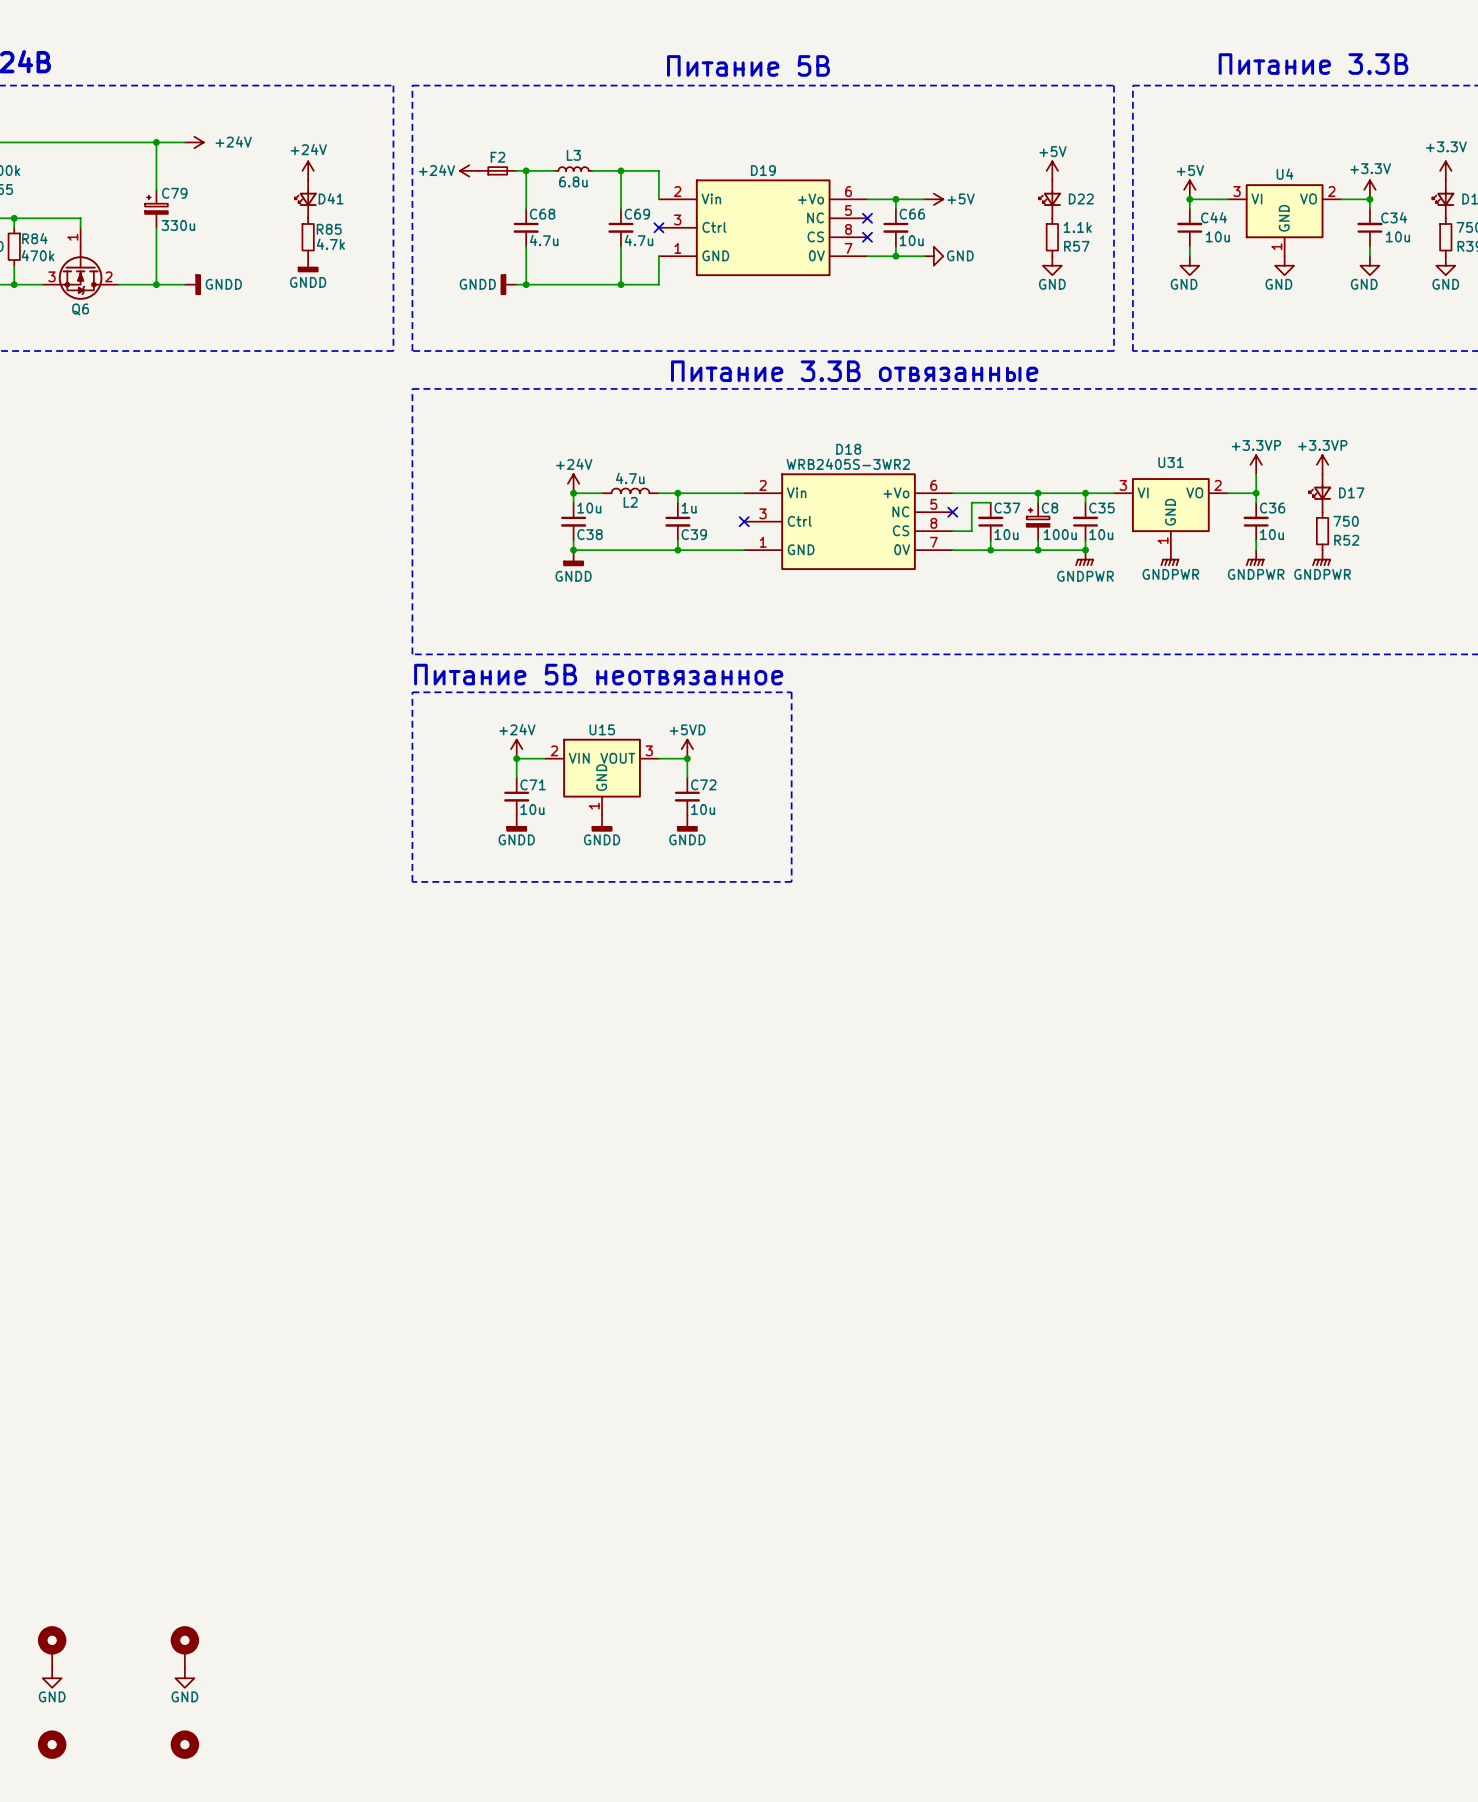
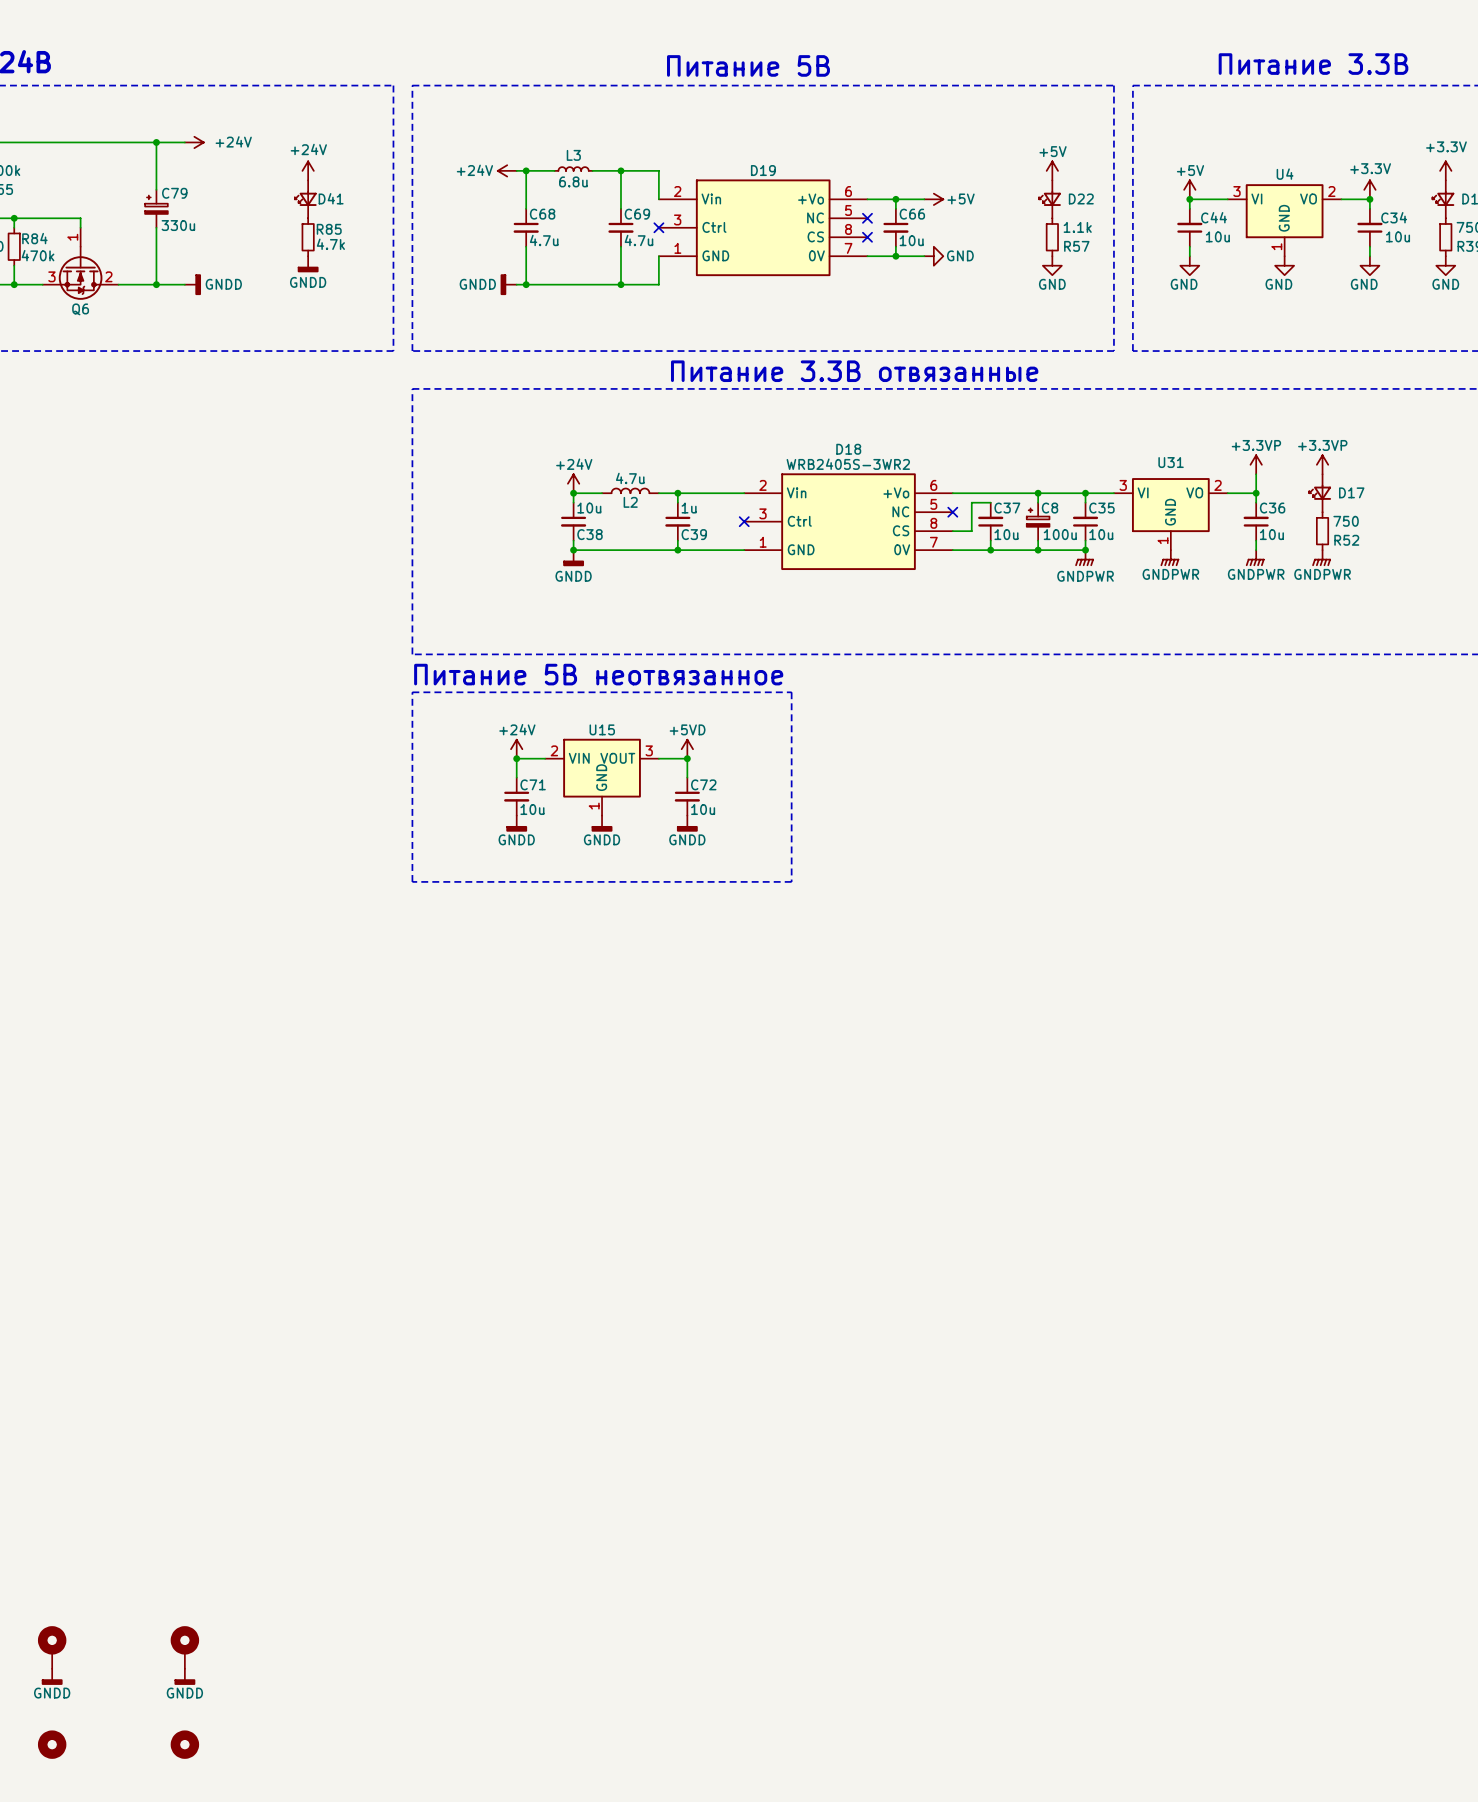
power symbol position: +24V (469, 170) -> +24V (507, 170)
F2: (497, 170) -> none
power symbol: GND (52, 1678) -> GNDD (52, 1676)
power symbol: GND (184, 1678) -> GNDD (184, 1676)

